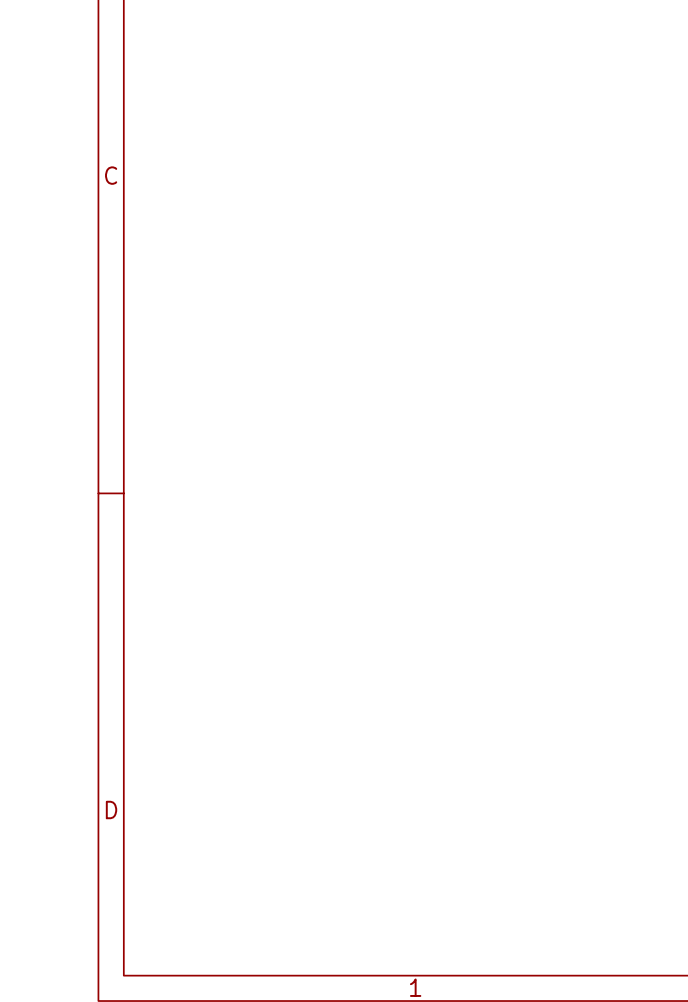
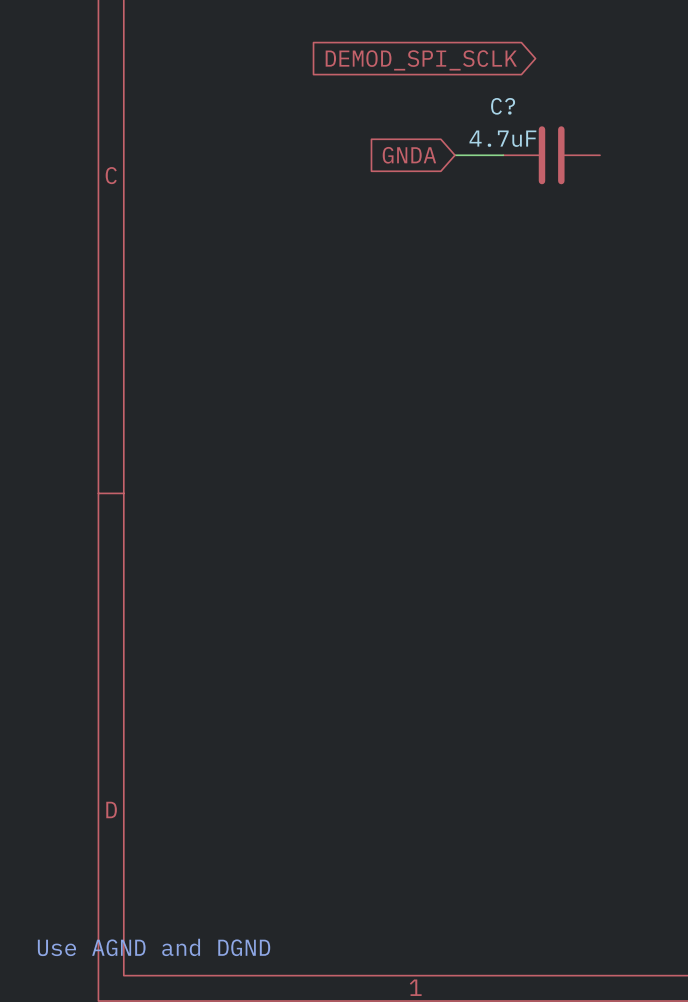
global label: none -> DEMOD_SPI_SCLK (421, 60)
global label: none -> GNDA (409, 155)
wire: none -> (454, 155) (503, 155)
C?: none -> 4.7uF (551, 155)
text: none -> Use AGND and DGND (154, 947)

